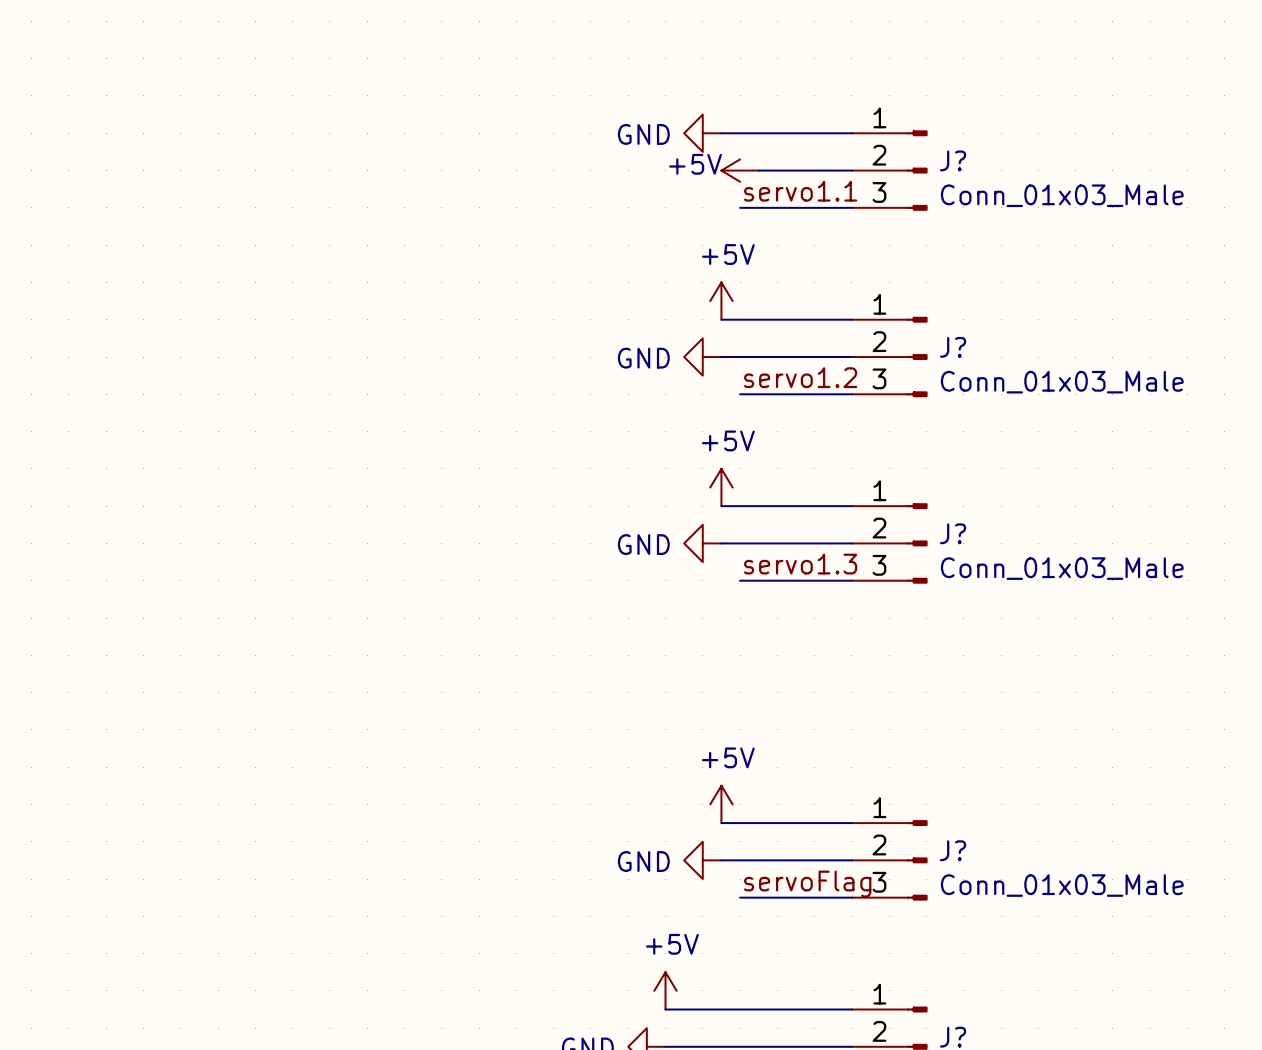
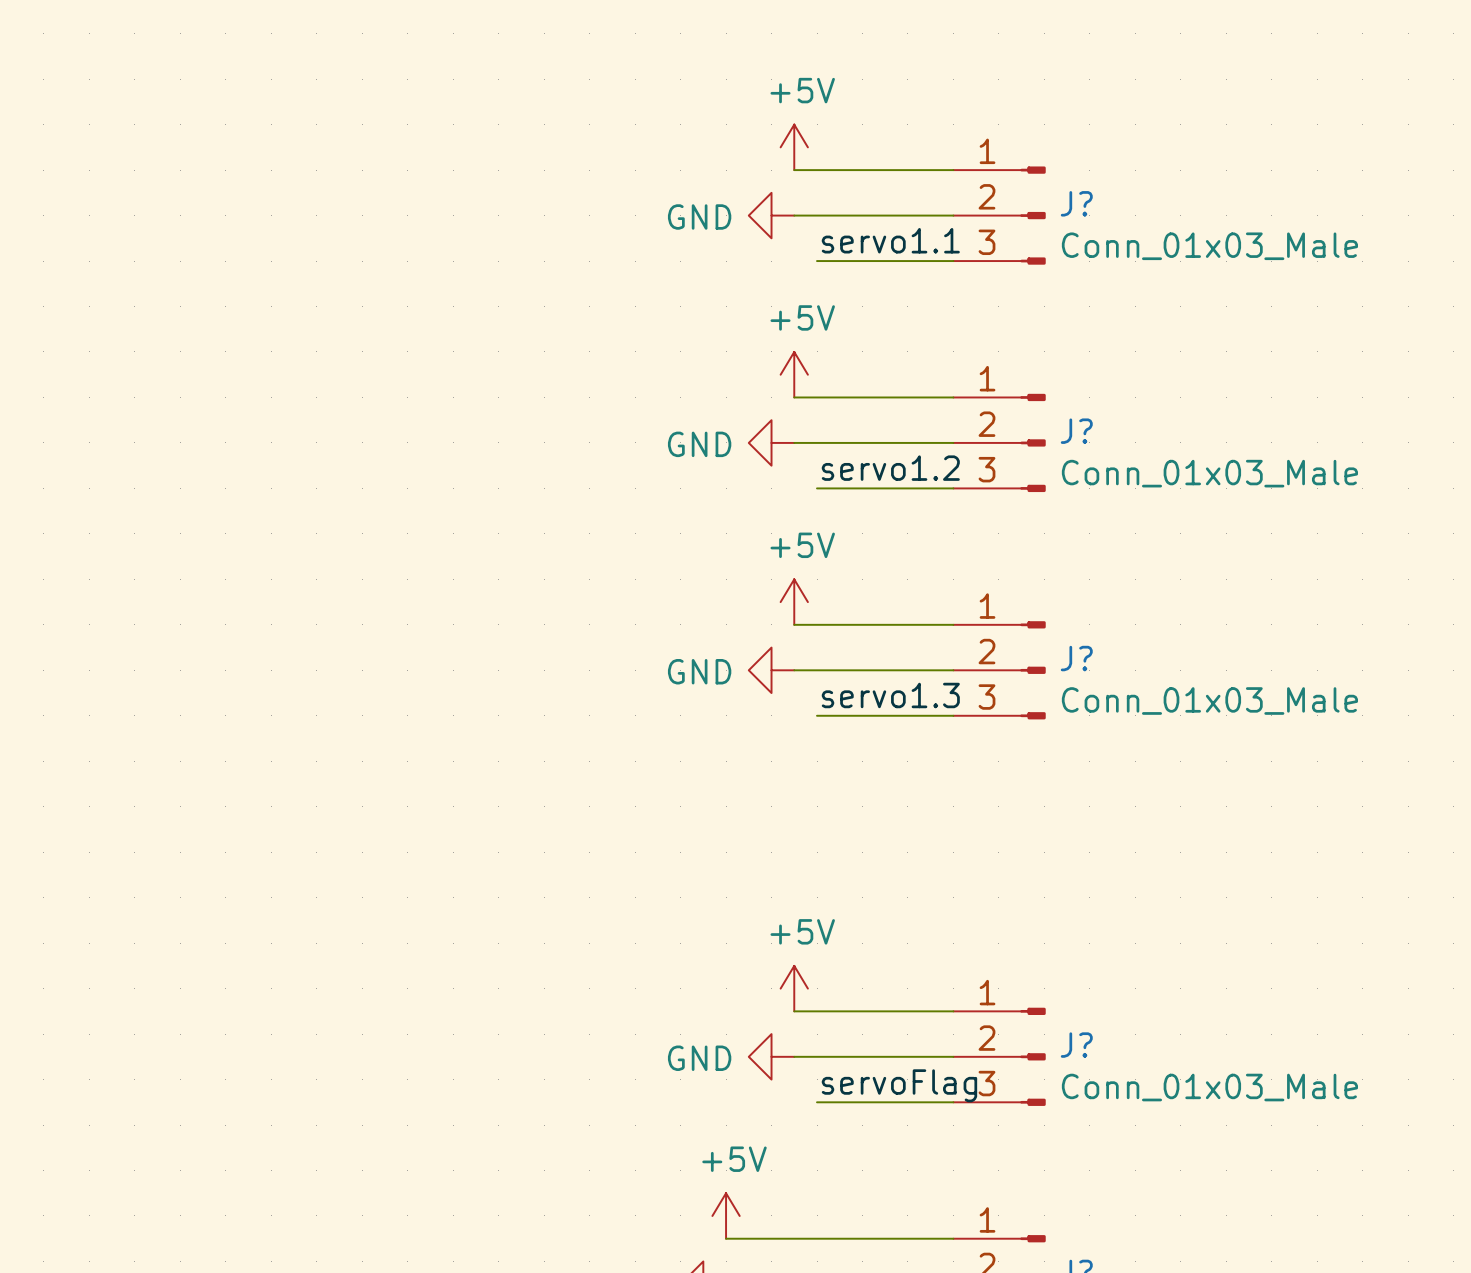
power symbol position: GND (702, 133) -> GND (771, 215)
power symbol rotation: 0° (740, 170) -> 90° clockwise (794, 147)
power symbol position: +5V (740, 170) -> +5V (794, 147)

